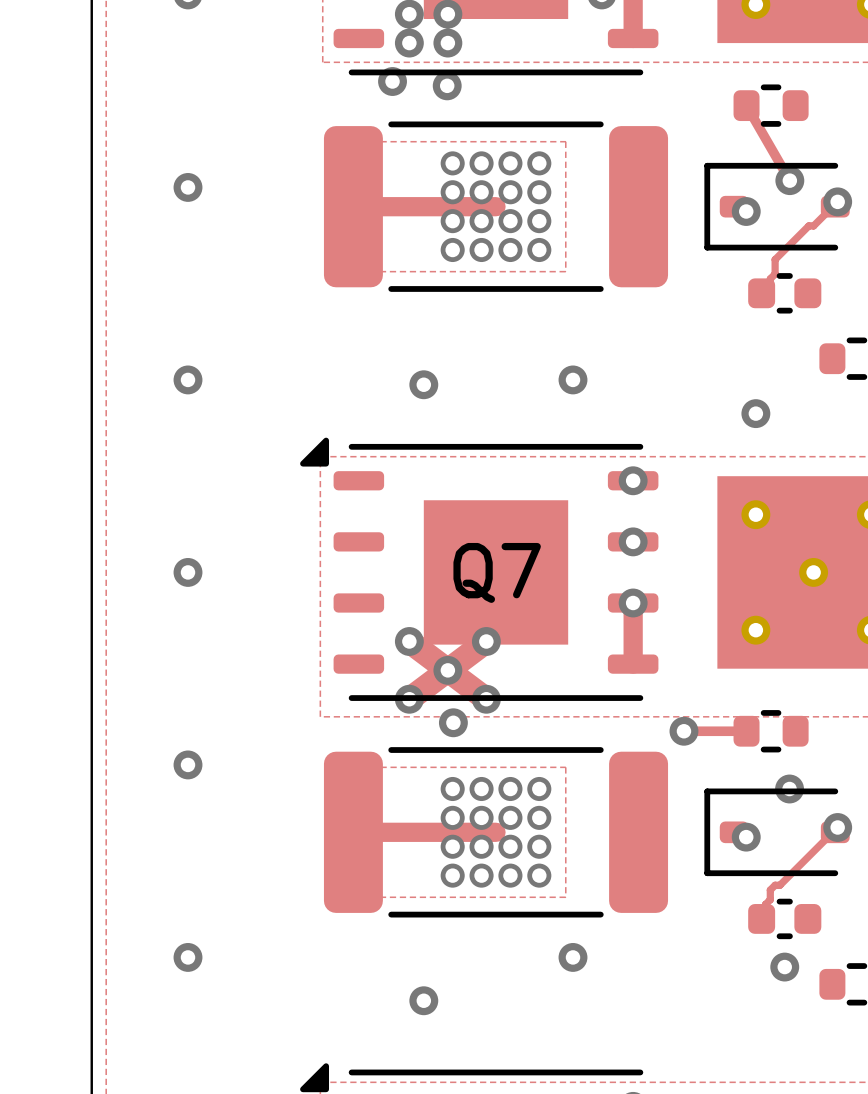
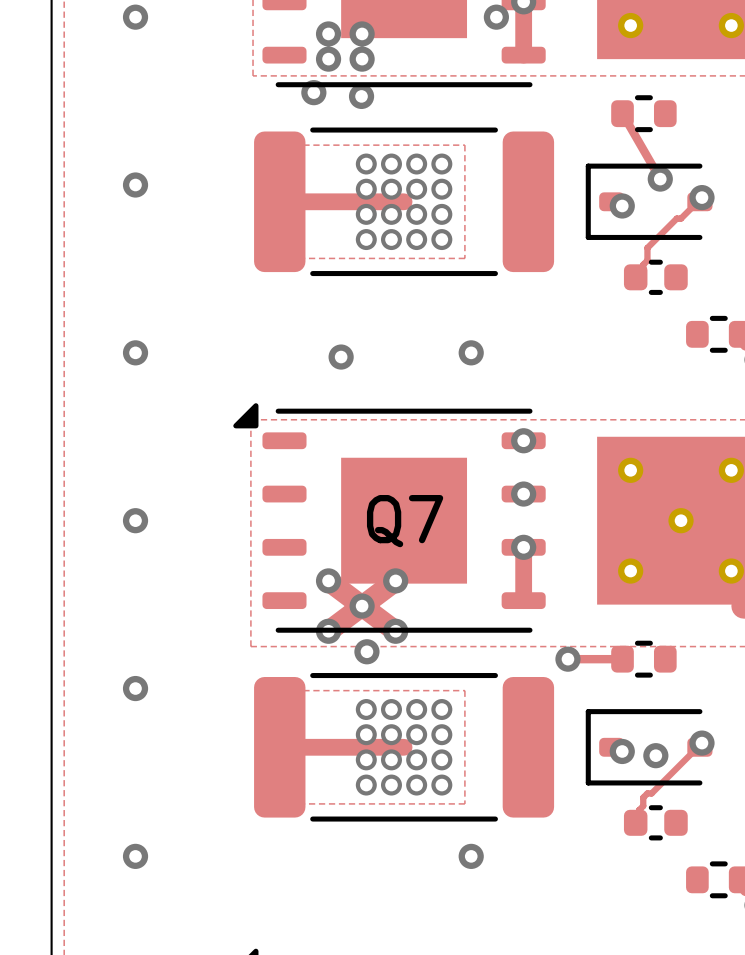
via: (755, 413) -> none
via position: (789, 789) -> (655, 755)
via: (784, 967) -> none
via: (423, 1000) -> none

